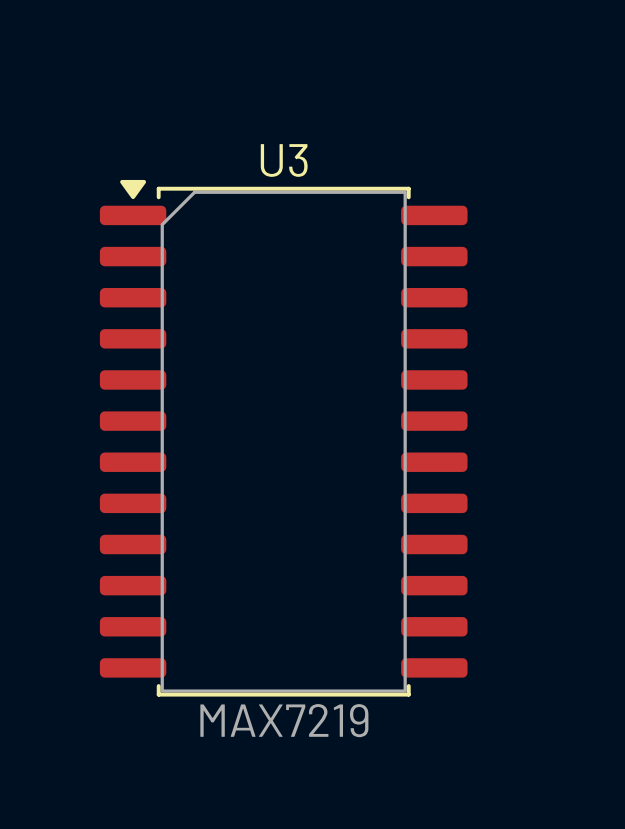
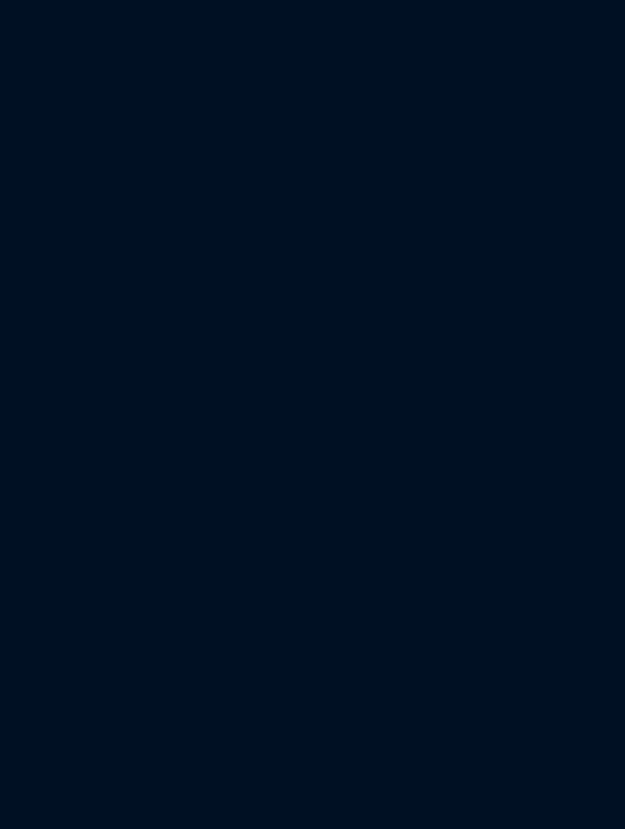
U3: MAX7219 (283, 438) -> none

